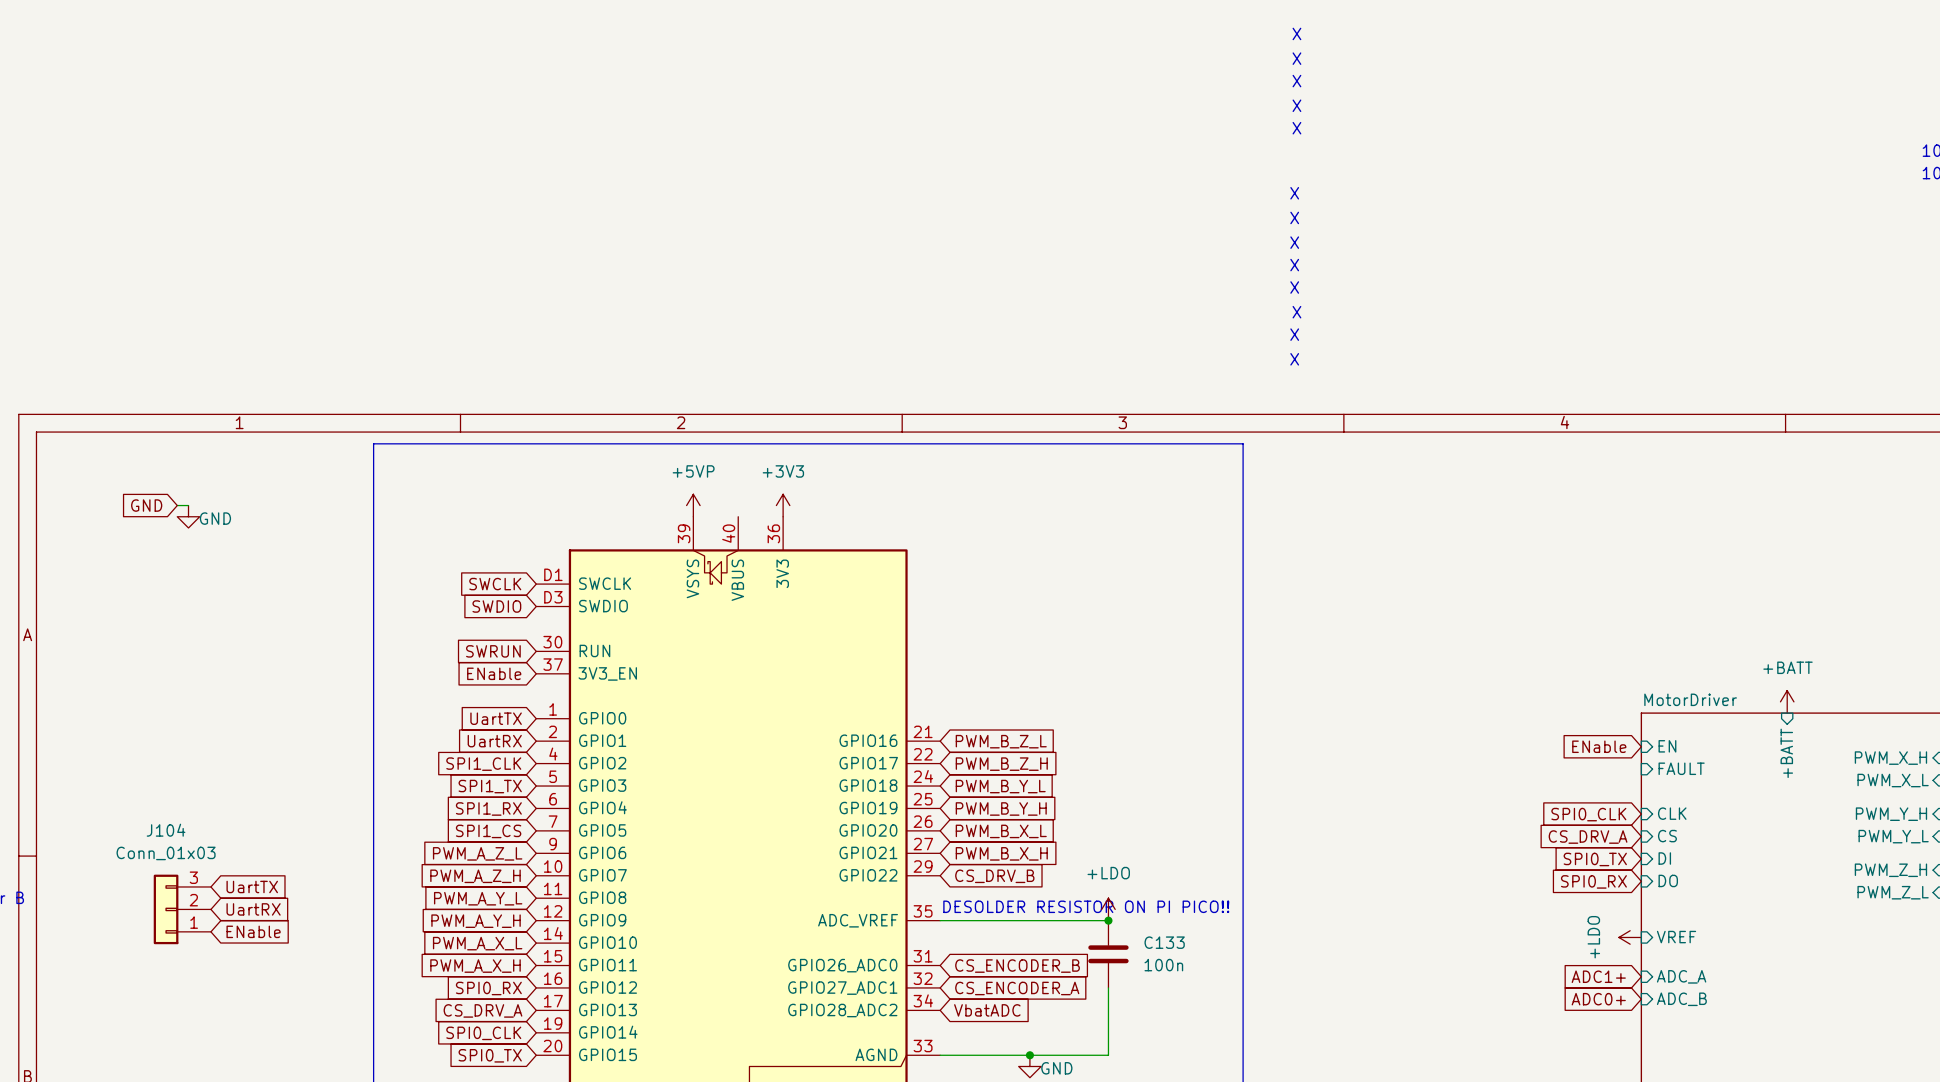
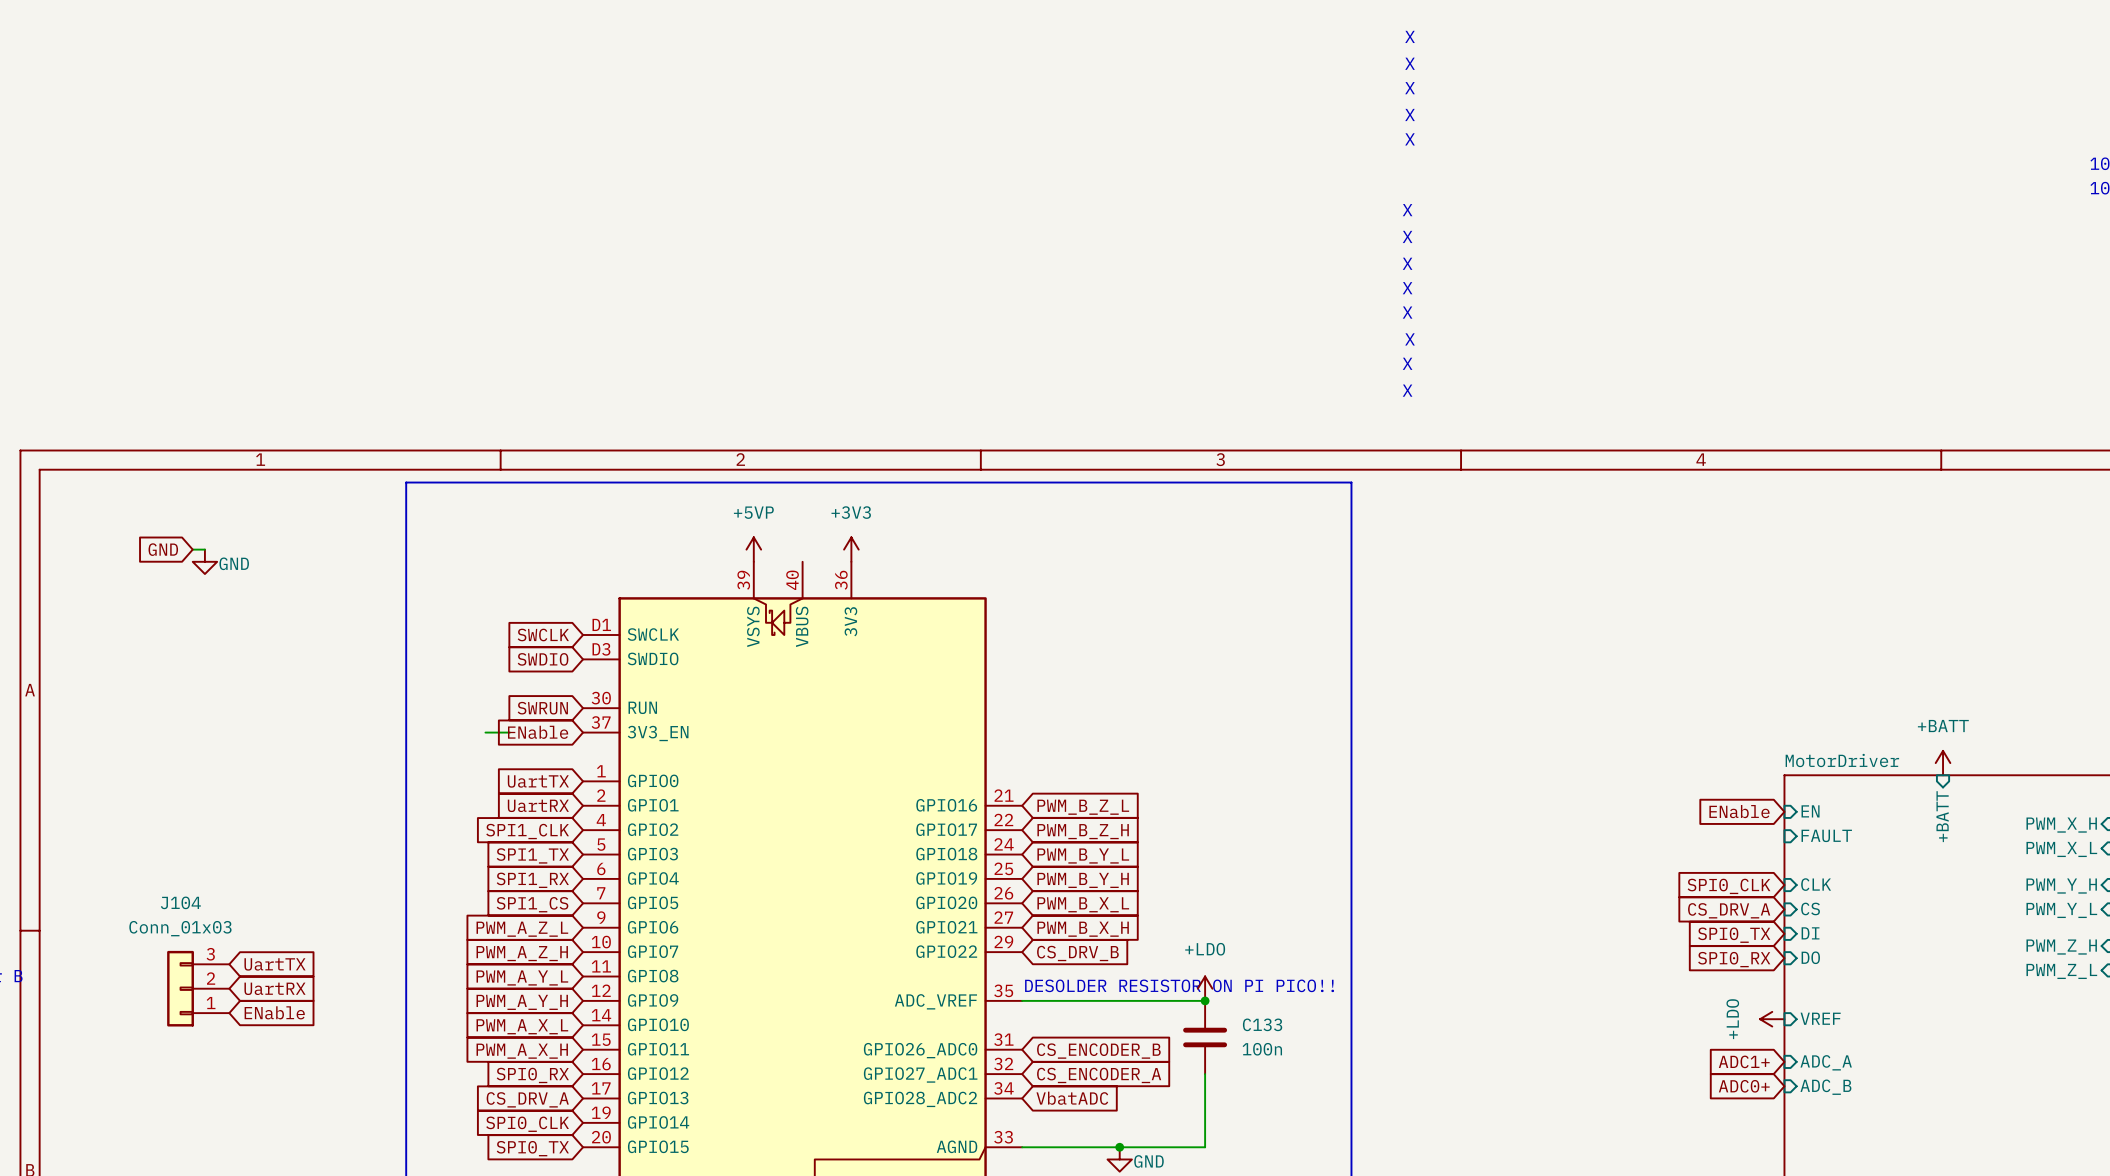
wire: none -> (485, 732) (509, 732)

